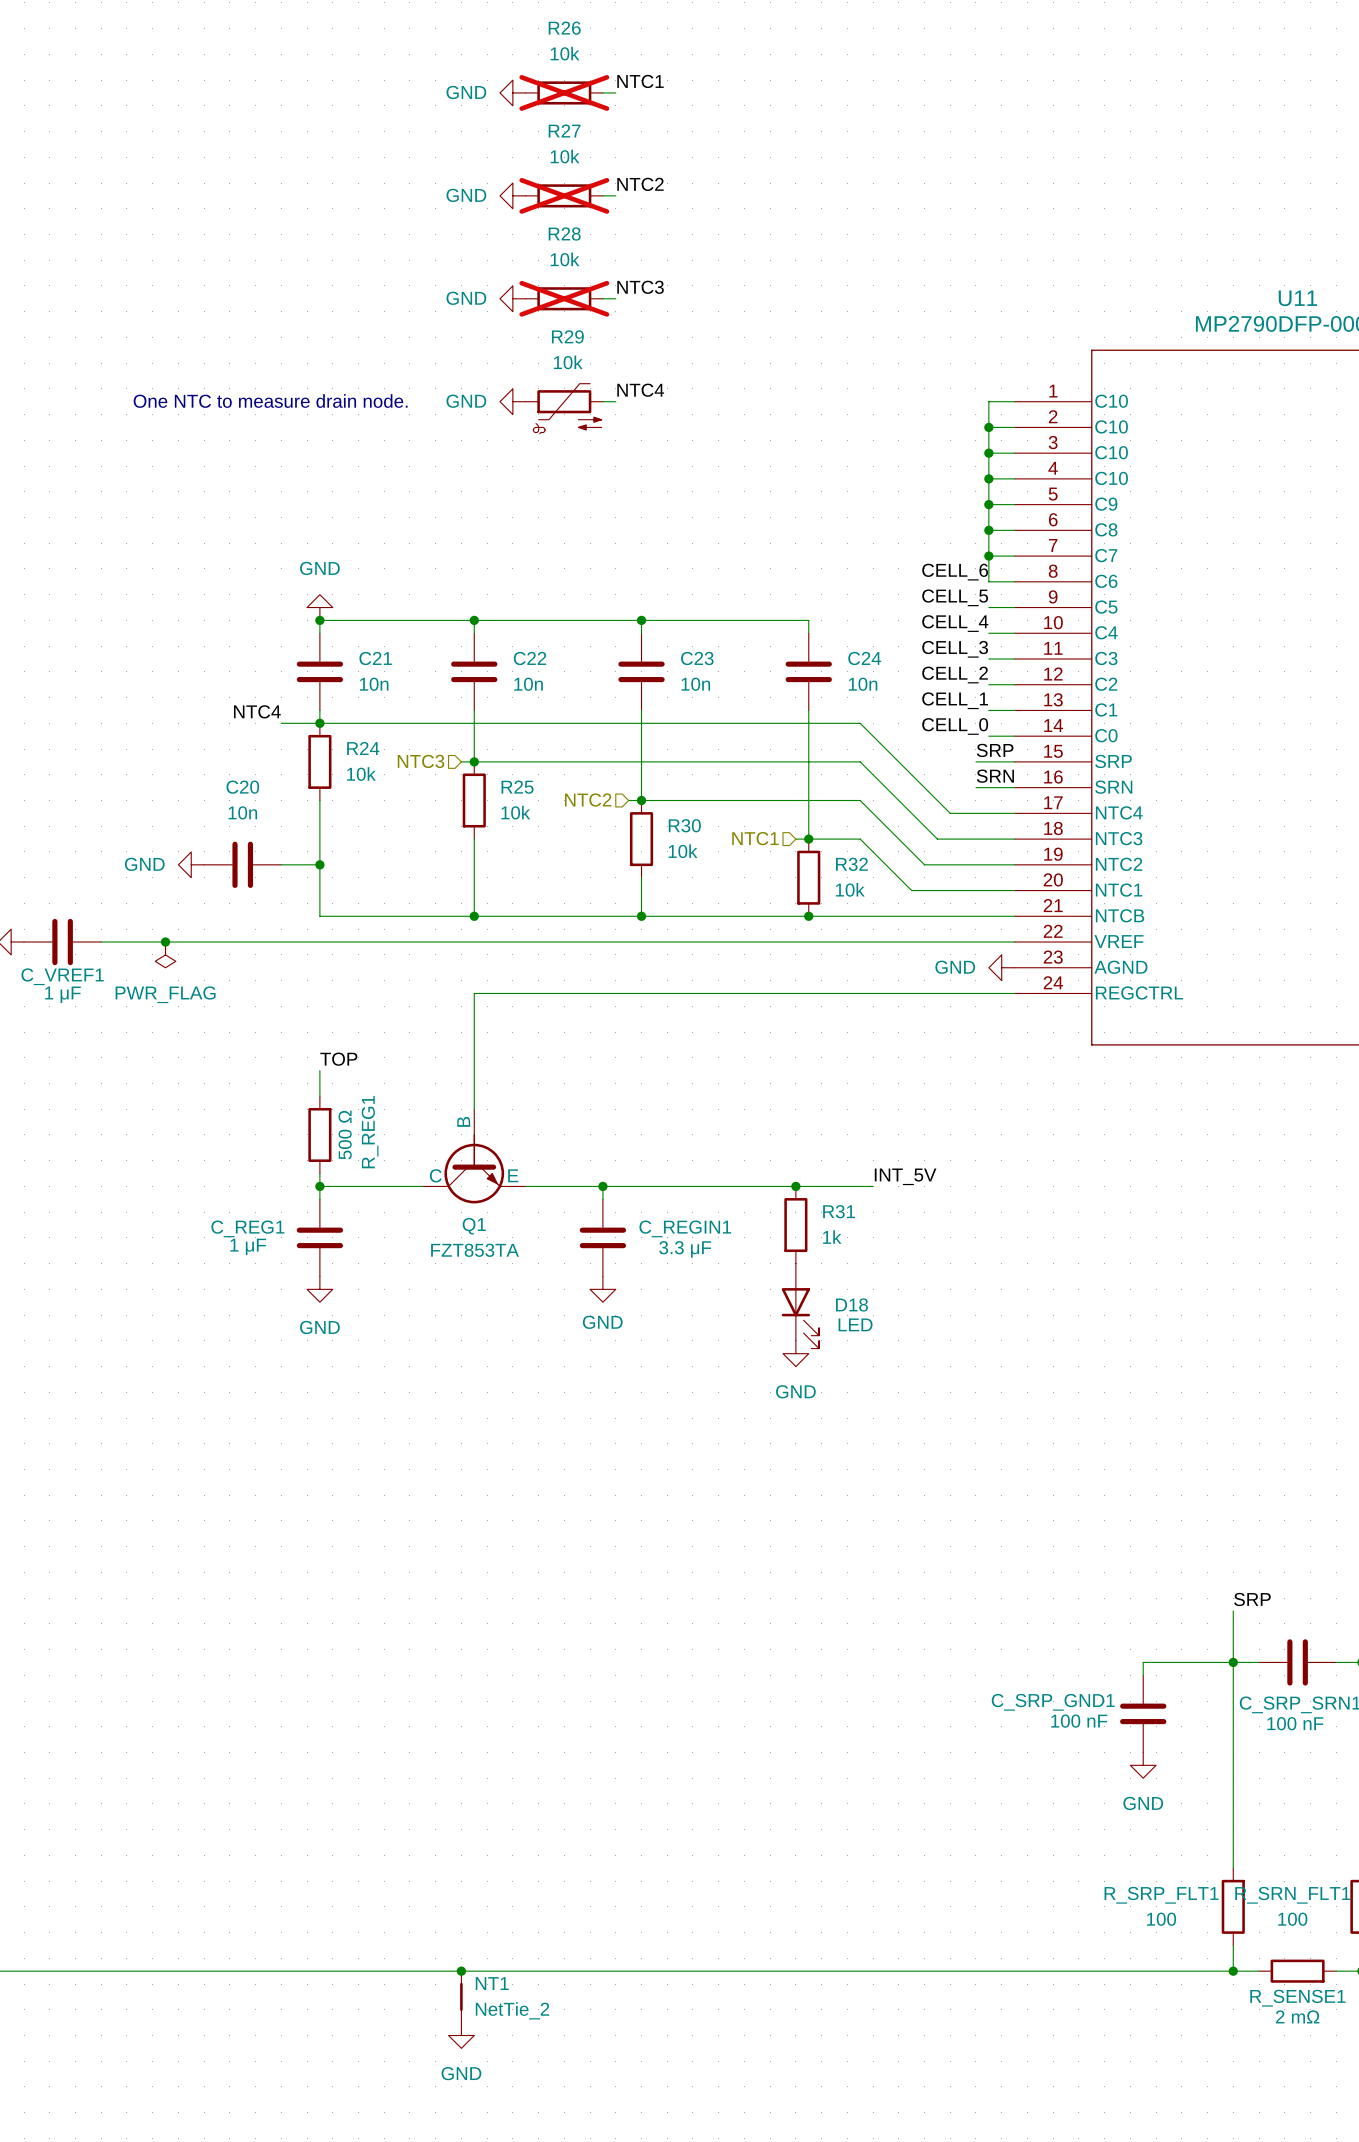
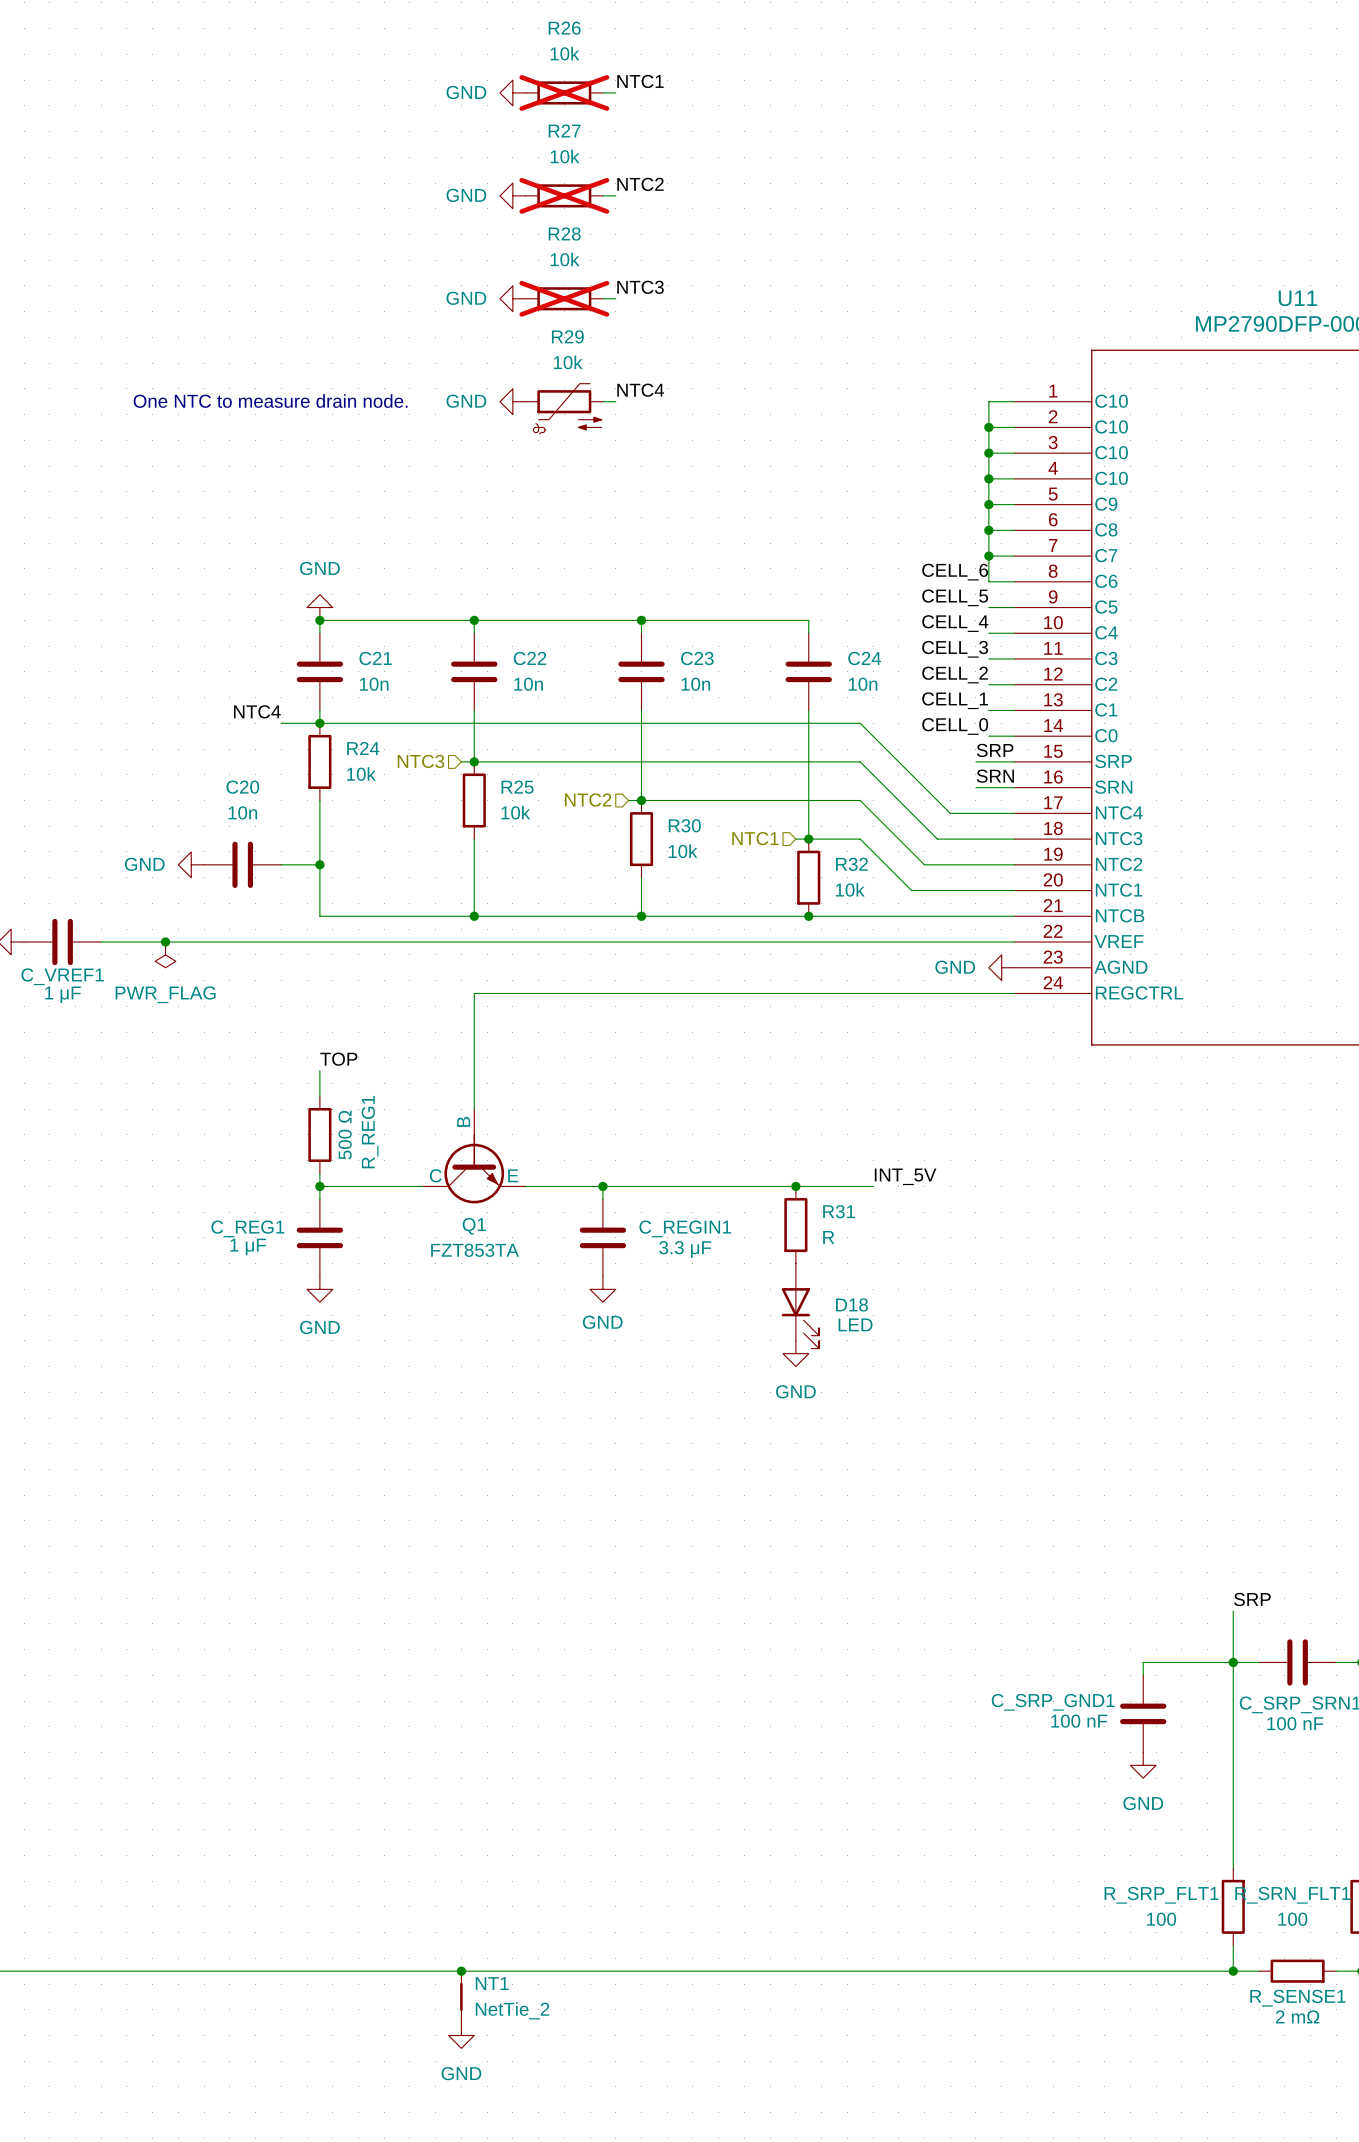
R31 value: 1k (832, 1237) -> R (828, 1237)

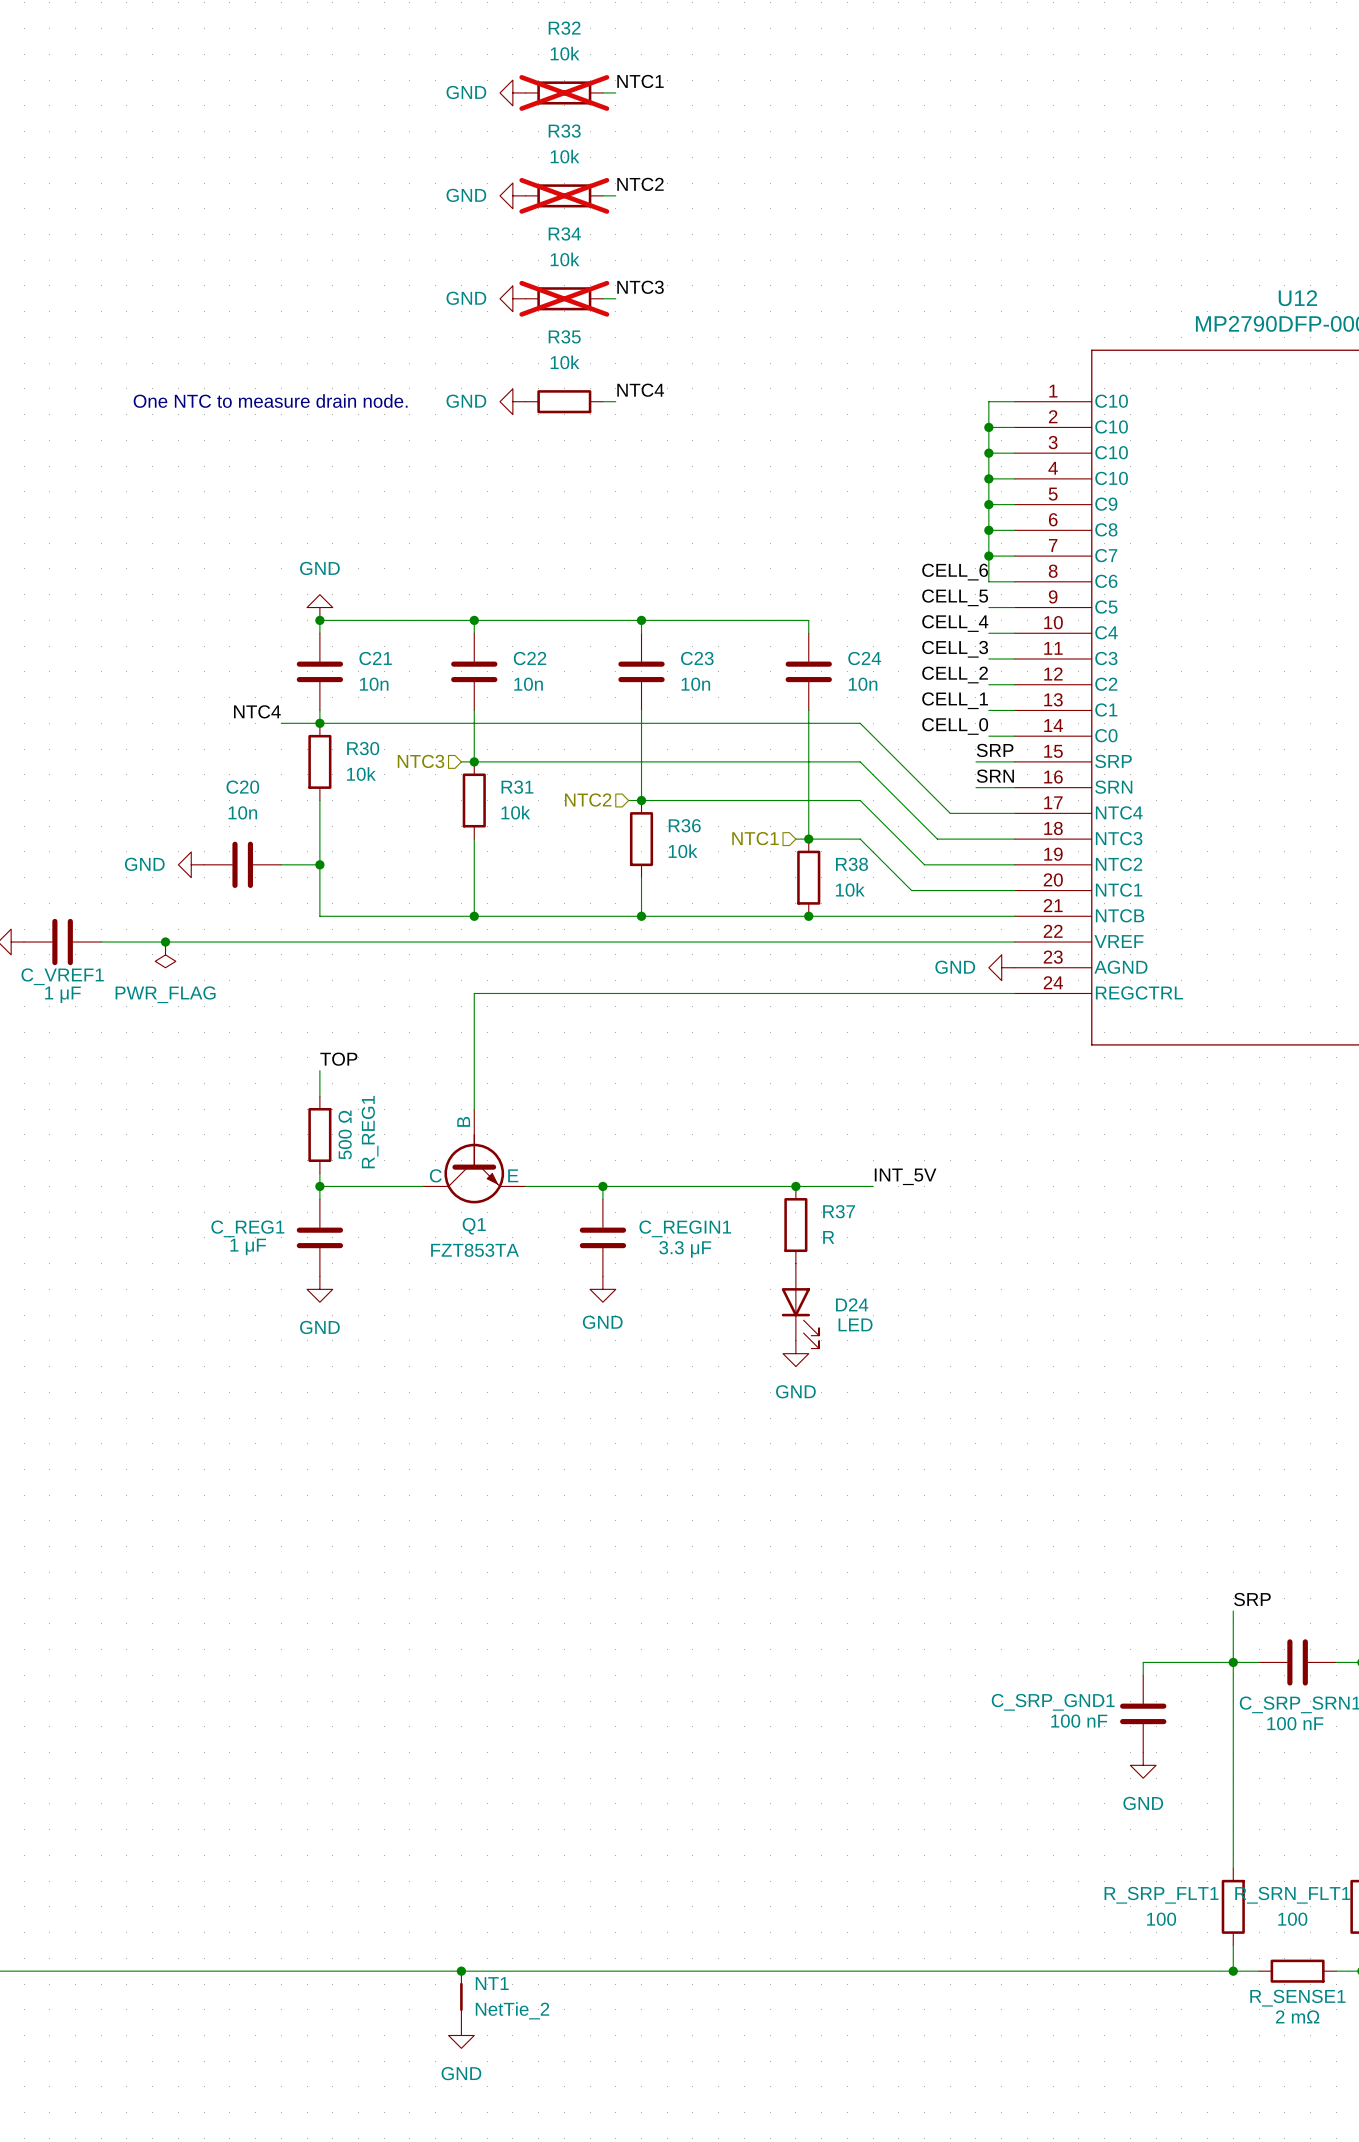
R26 name: R26 (564, 28) -> R32 (564, 28)
R27 name: R27 (564, 130) -> R33 (564, 131)
R28 name: R28 (564, 233) -> R34 (564, 233)
U11 name: U11 (1297, 298) -> U12 (1297, 298)
R35: none -> 10k (564, 401)
R29: 10k (564, 408) -> none
R24 name: R24 (363, 748) -> R30 (363, 748)
R25 name: R25 (517, 787) -> R31 (517, 787)
R30 name: R30 (684, 825) -> R36 (684, 825)
R32 name: R32 (851, 864) -> R38 (851, 864)
R31 name: R31 (839, 1211) -> R37 (839, 1211)
D18 name: D18 (851, 1304) -> D24 (852, 1304)

